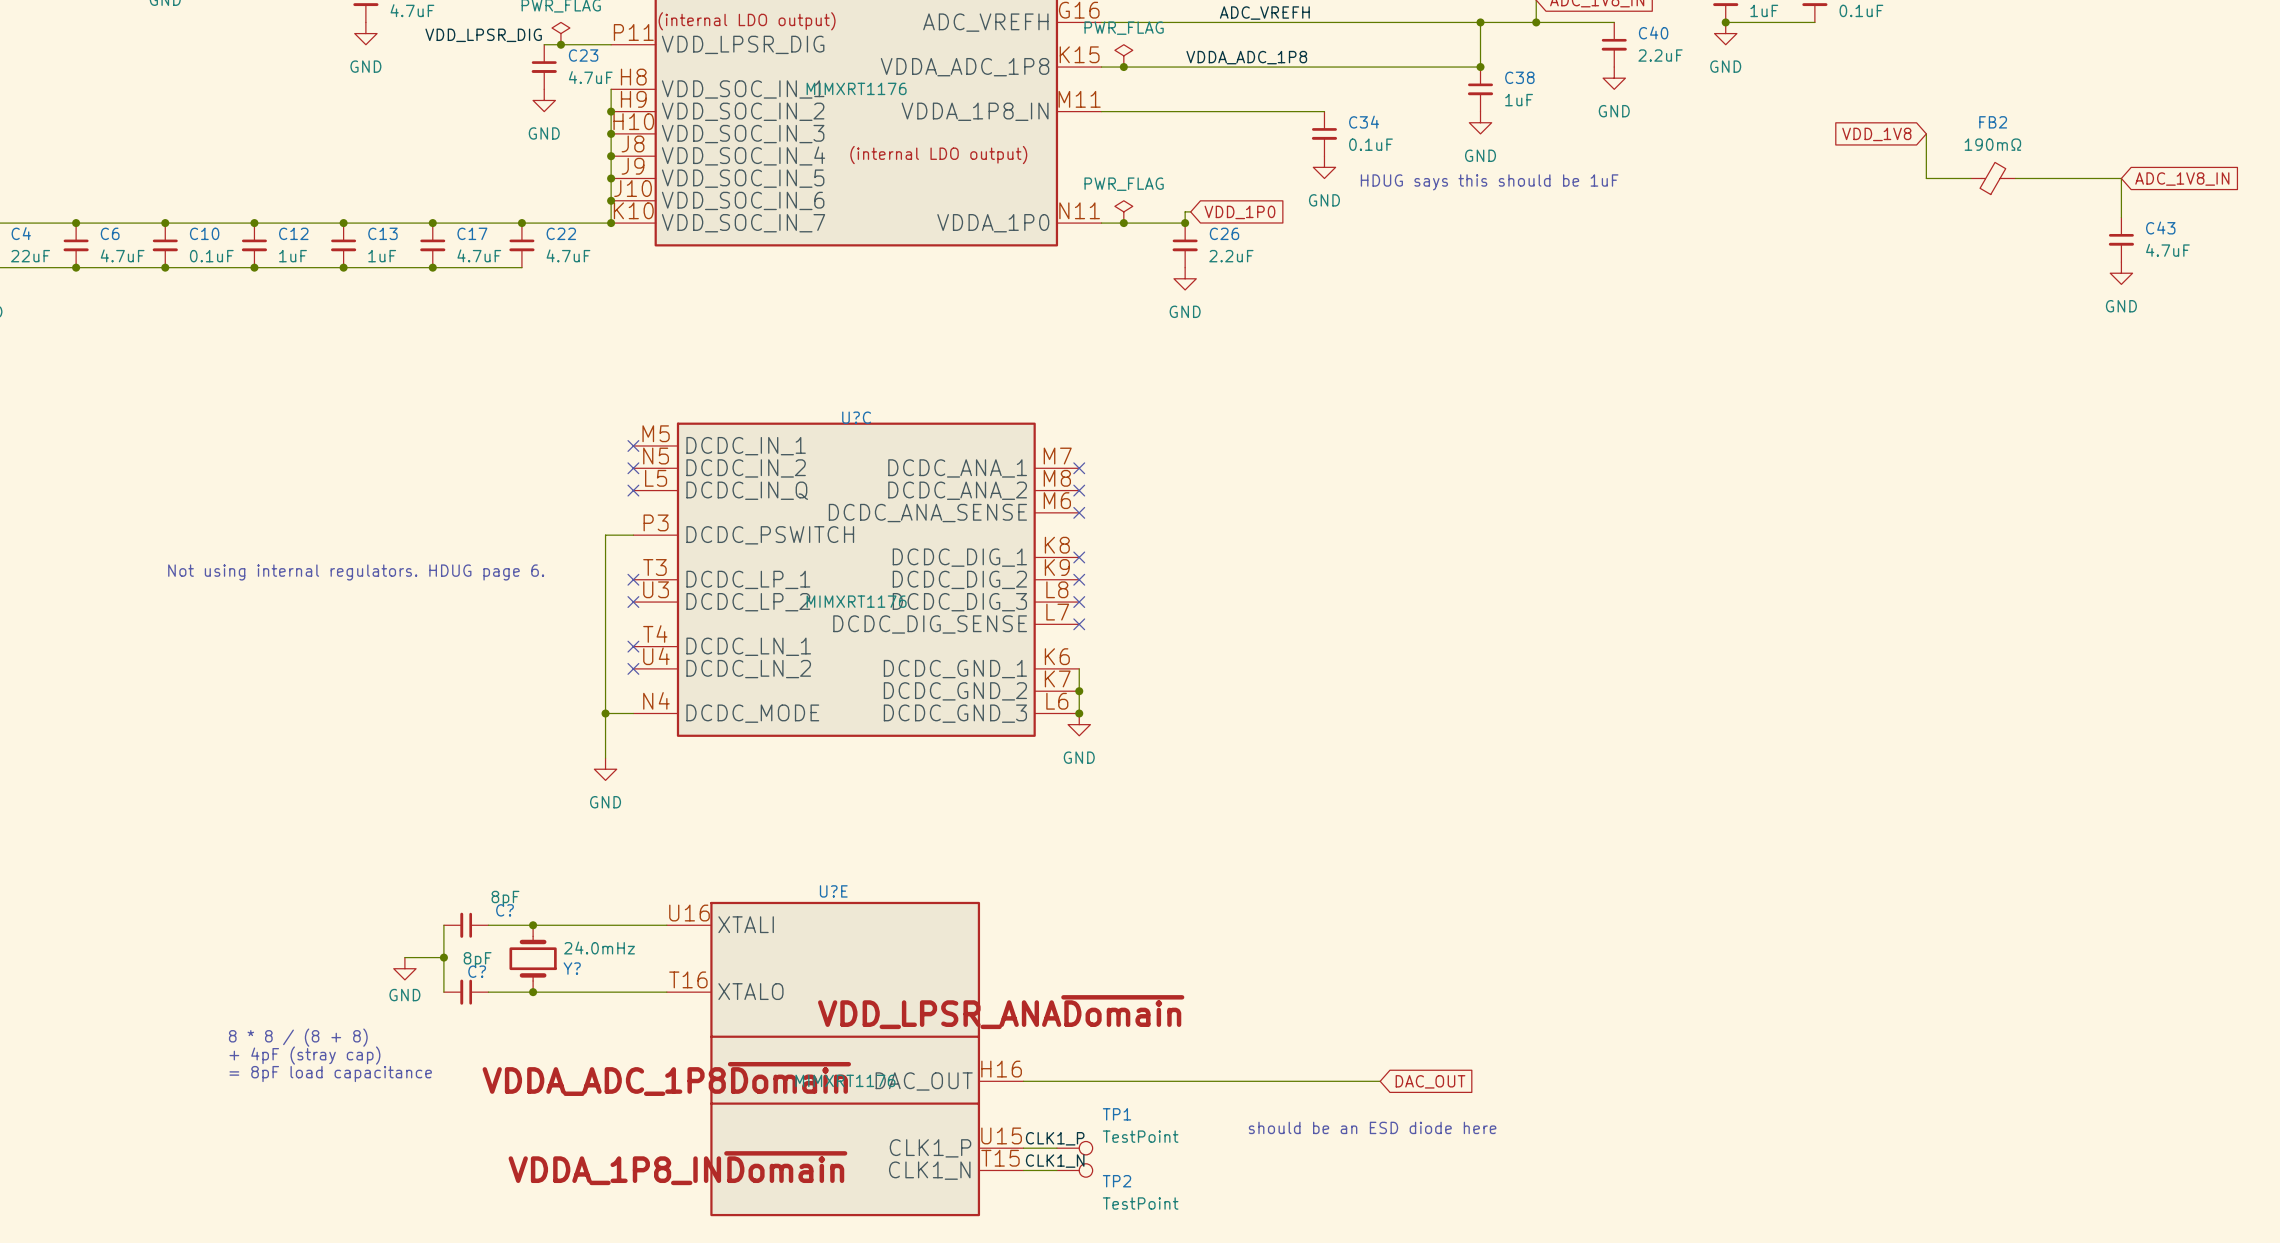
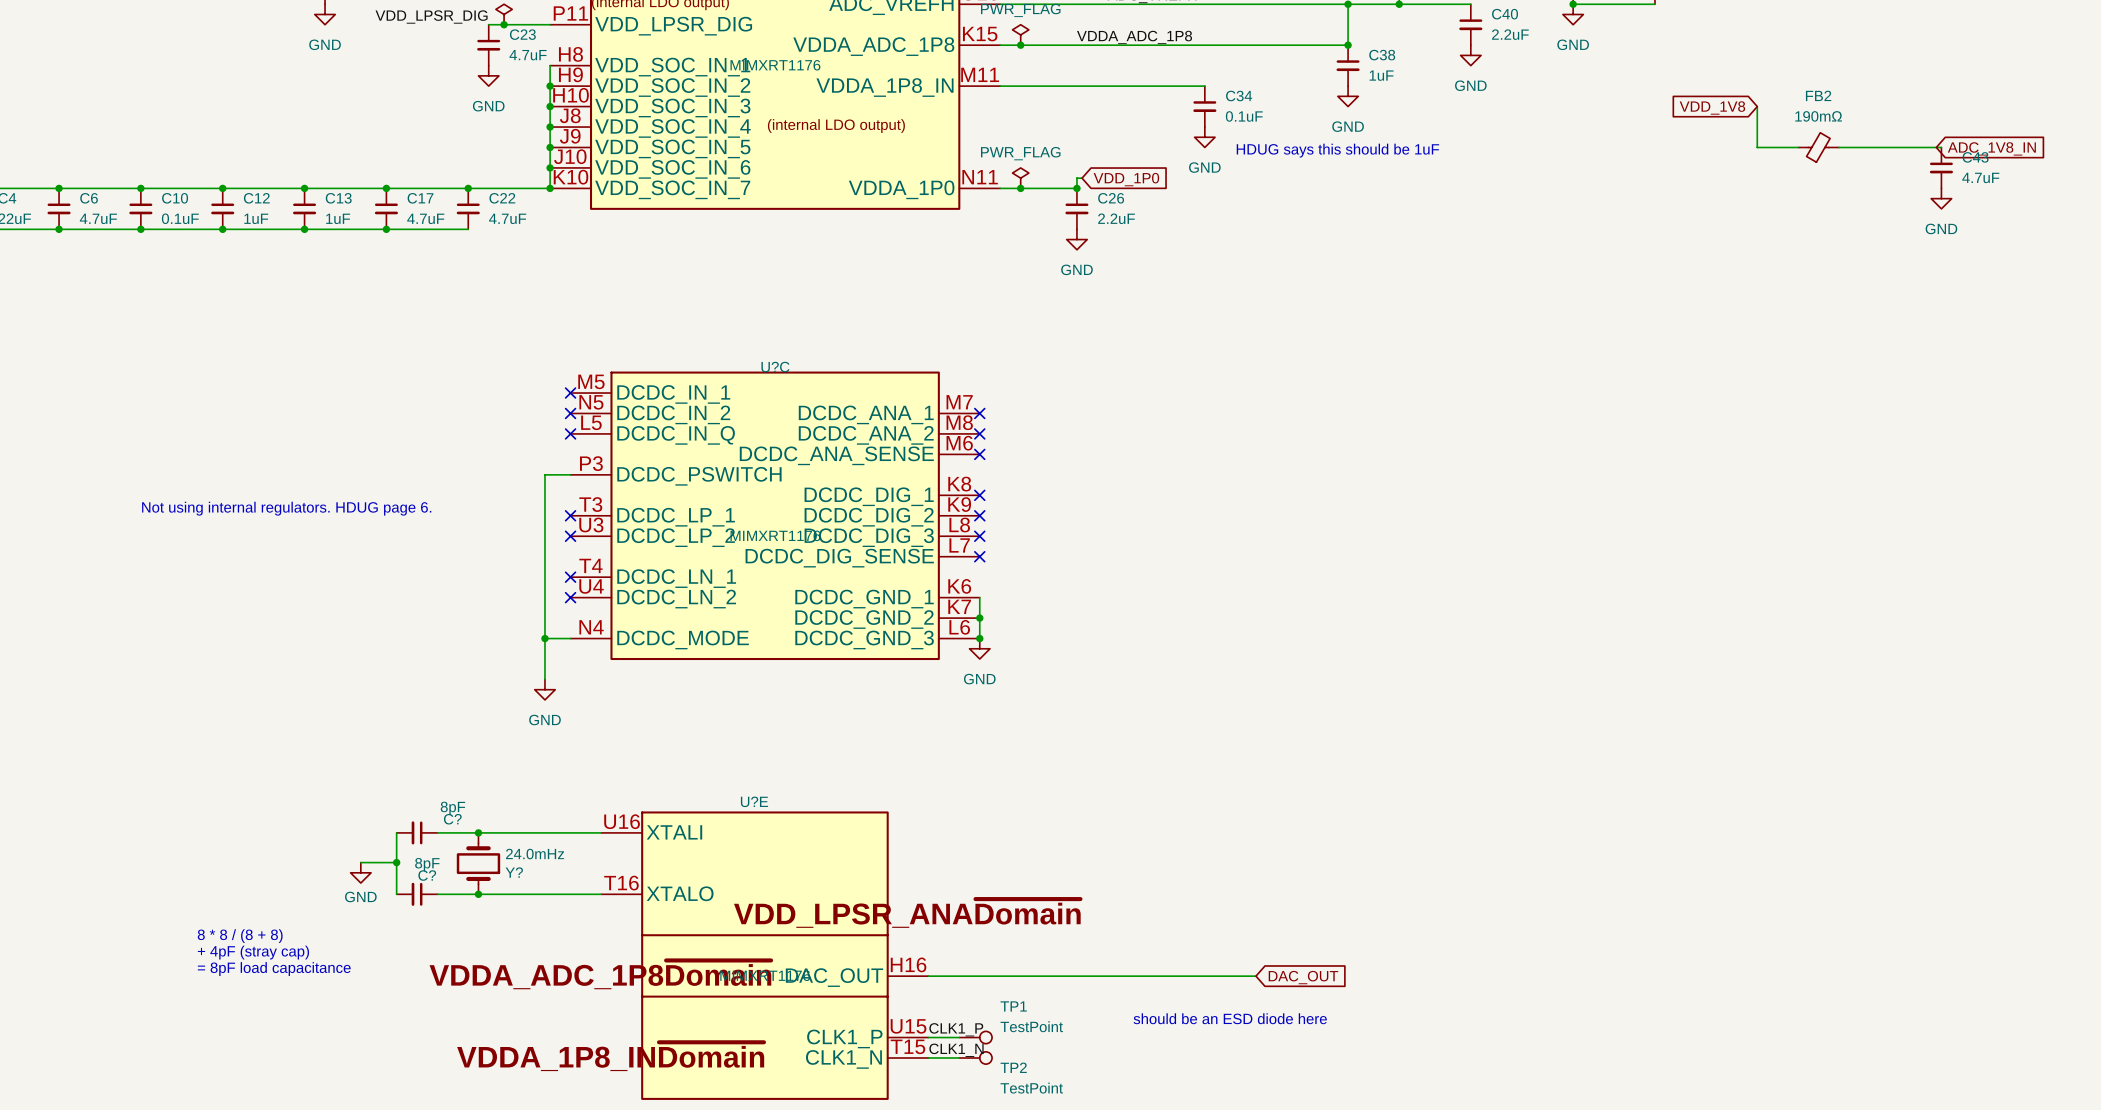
wire: (2121, 178) (2121, 217) -> (1936, 147) (1941, 147)
C43 position: (2121, 239) -> (1941, 167)
power symbol position: GND (2121, 273) -> GND (1941, 198)

